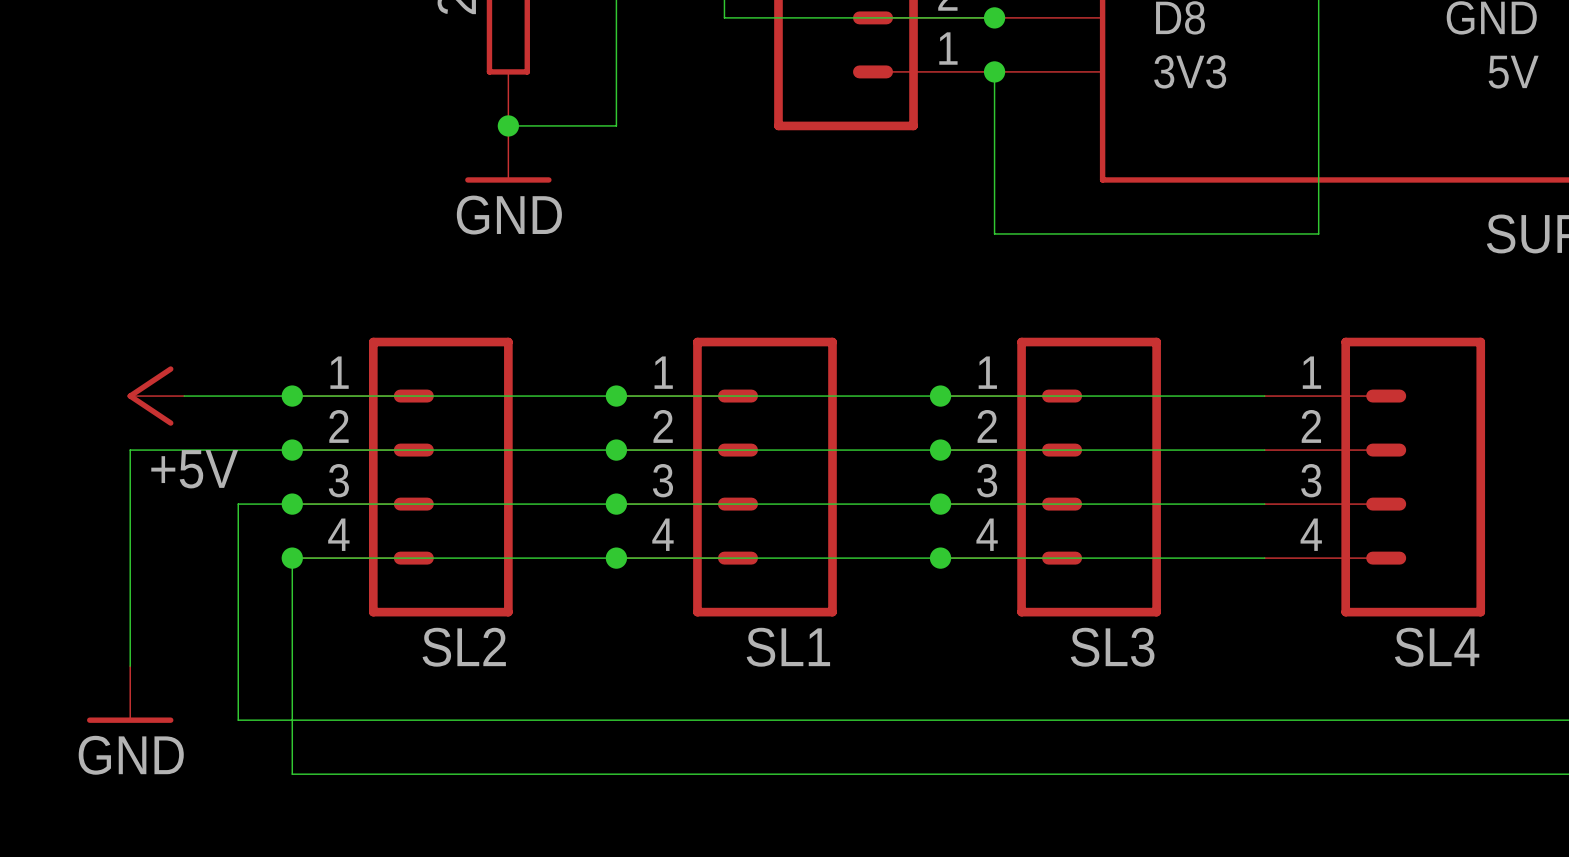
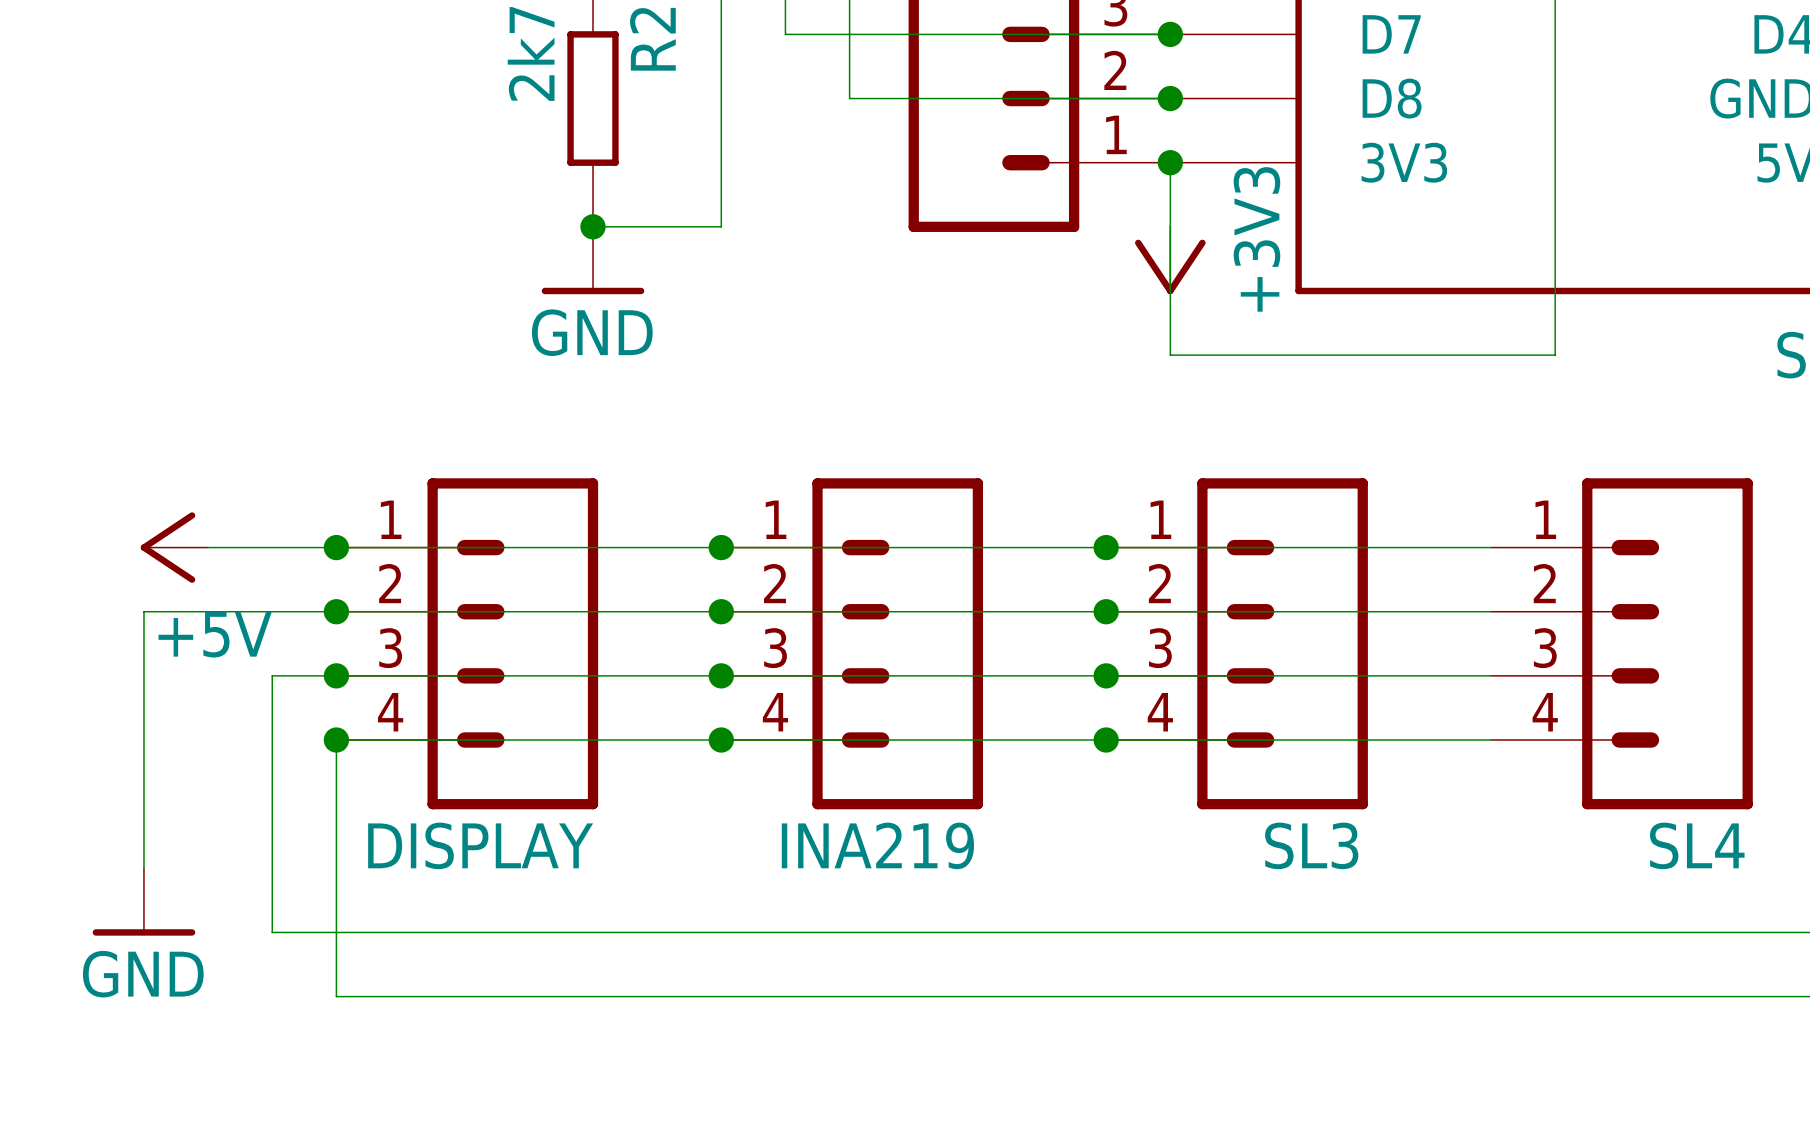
power symbol: none -> +3V3 (1170, 260)
SL2 name: SL2 (464, 647) -> DISPLAY (480, 845)
SL1 name: SL1 (788, 647) -> INA219 (877, 845)

